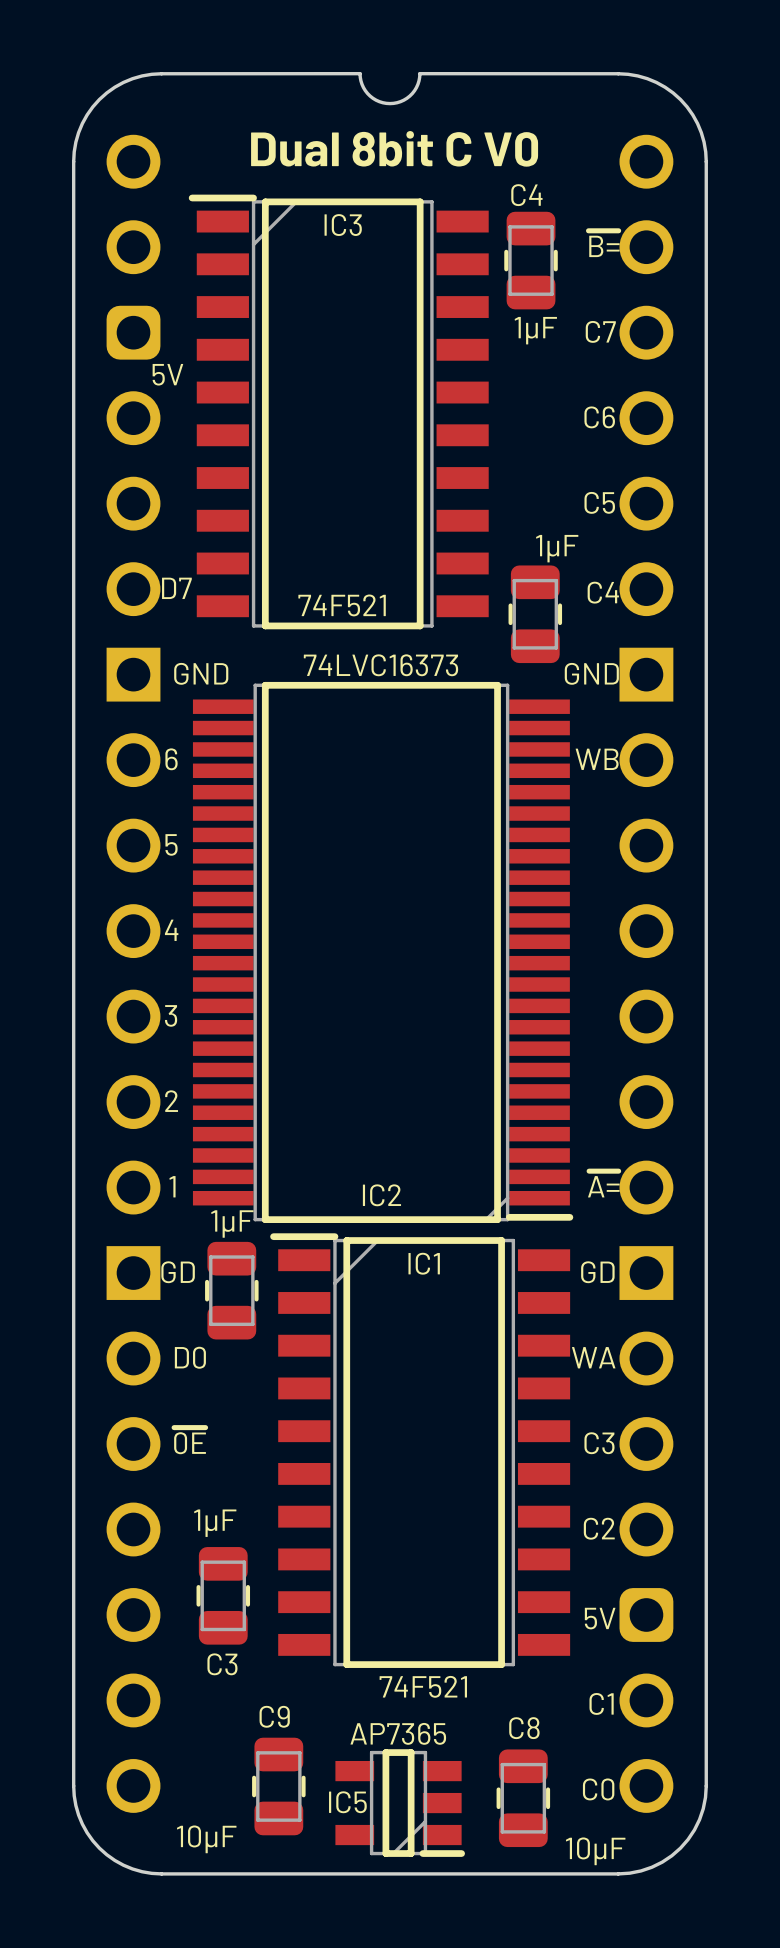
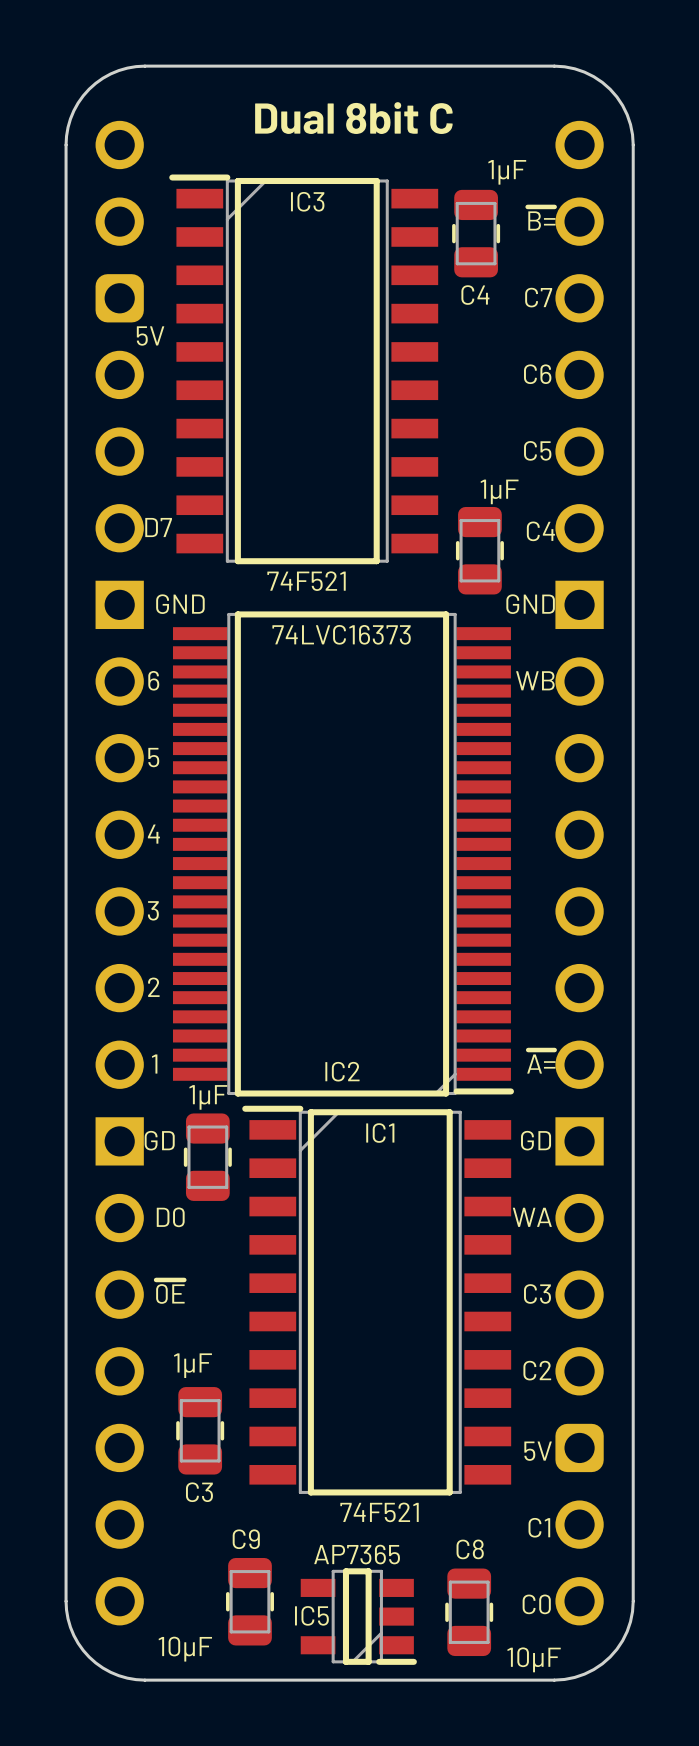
part footprint: [71, 71, 708, 1876] -> [64, 64, 635, 1682]
text: Dual 8bit C V0 (394, 148) -> Dual 8bit C (353, 118)
C4 name position: C4 (526, 195) -> C4 (475, 295)
C4 value position: 1μF (535, 330) -> 1μF (507, 172)
IC3 text position: 74F521 (342, 605) -> 74F521 (306, 581)
IC2 text position: 74LVC16373 (380, 665) -> 74LVC16373 (341, 634)

